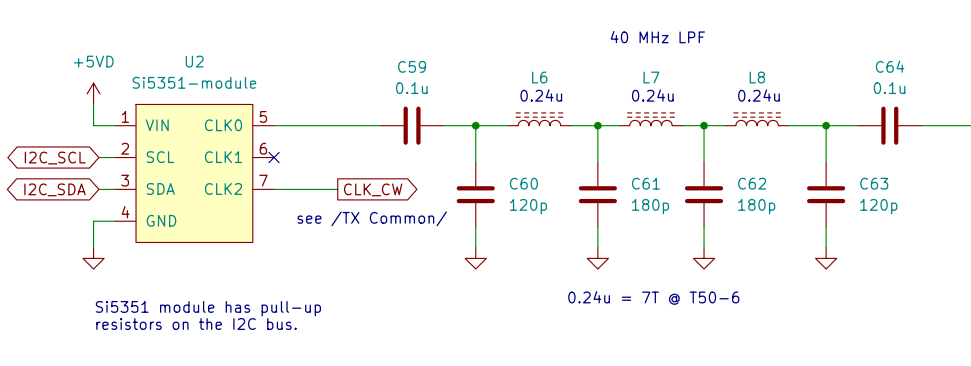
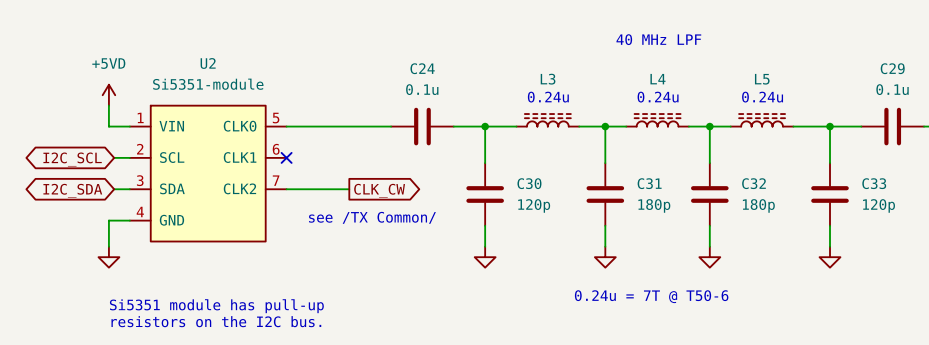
C59 name: C59 (412, 66) -> C24 (422, 68)
C64 name: C64 (890, 66) -> C29 (892, 68)
L6 name: L6 (539, 77) -> L3 (548, 79)
L7 name: L7 (651, 77) -> L4 (657, 79)
L8 name: L8 (757, 77) -> L5 (762, 79)
C60 name: C60 (523, 183) -> C30 (529, 183)
C61 name: C61 (645, 183) -> C31 (649, 183)
C62 name: C62 (752, 183) -> C32 (753, 183)
C63 name: C63 (874, 183) -> C33 (874, 183)

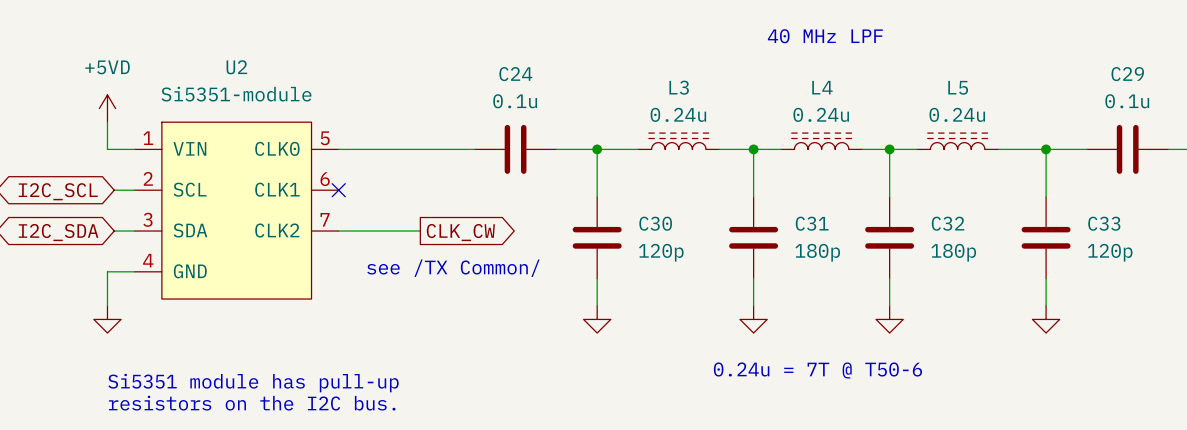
text: 0.24u (548, 97) -> none
text: 0.24u (658, 97) -> none
text: 0.24u (762, 97) -> none
L3 value: none -> 0.24u (678, 114)
L4 value: none -> 0.24u (821, 114)
L5 value: none -> 0.24u (957, 114)

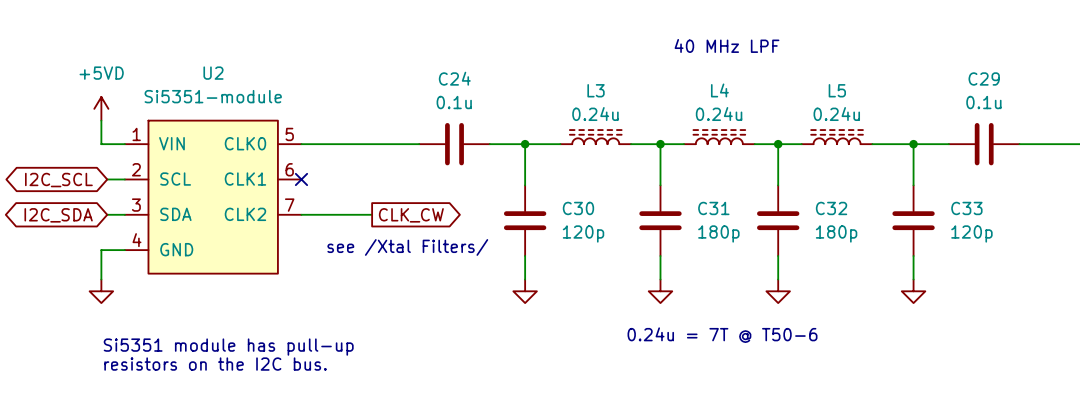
text: see /TX Common/ (453, 268) -> see /Xtal Filters/ (407, 247)

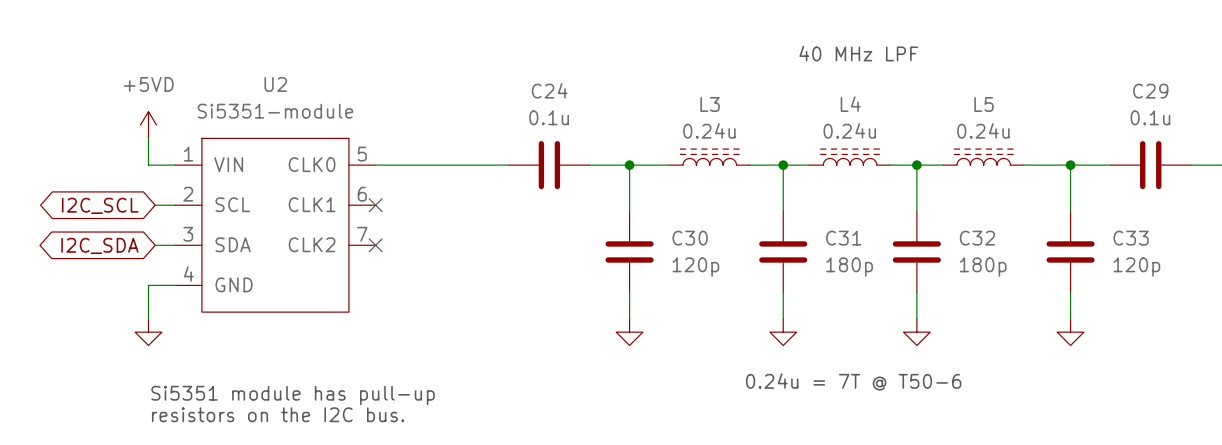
wire: (301, 214) (372, 214) -> none
no-connect mark: none -> (375, 245)
global label: CLK_CW (411, 215) -> none
text: see /Xtal Filters/ (407, 247) -> none

